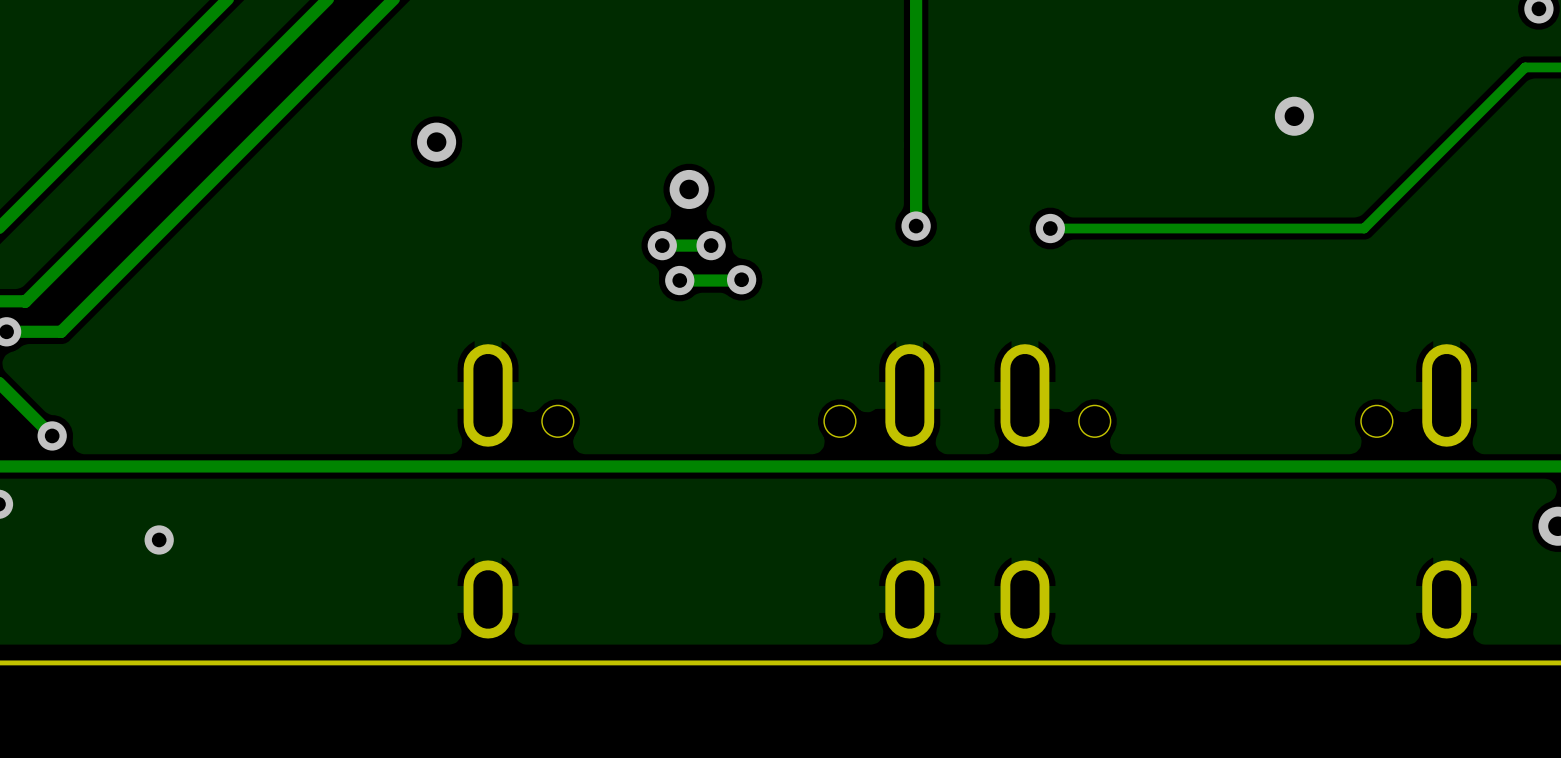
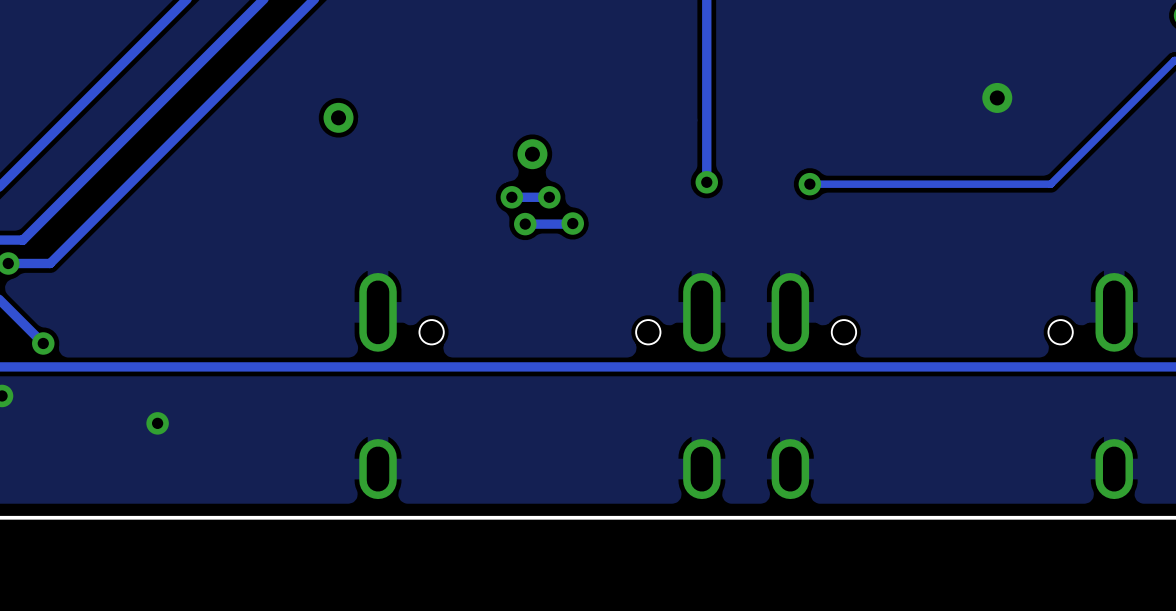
via position: (159, 539) -> (157, 423)

